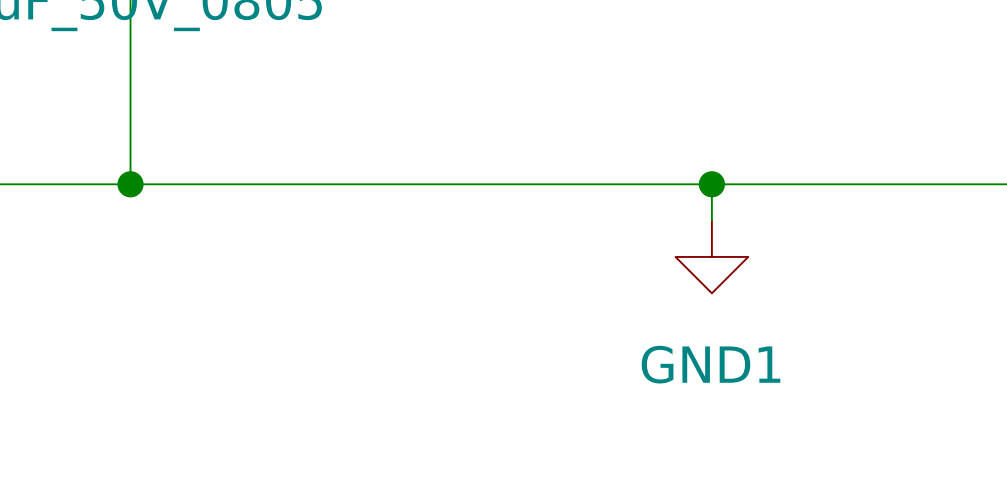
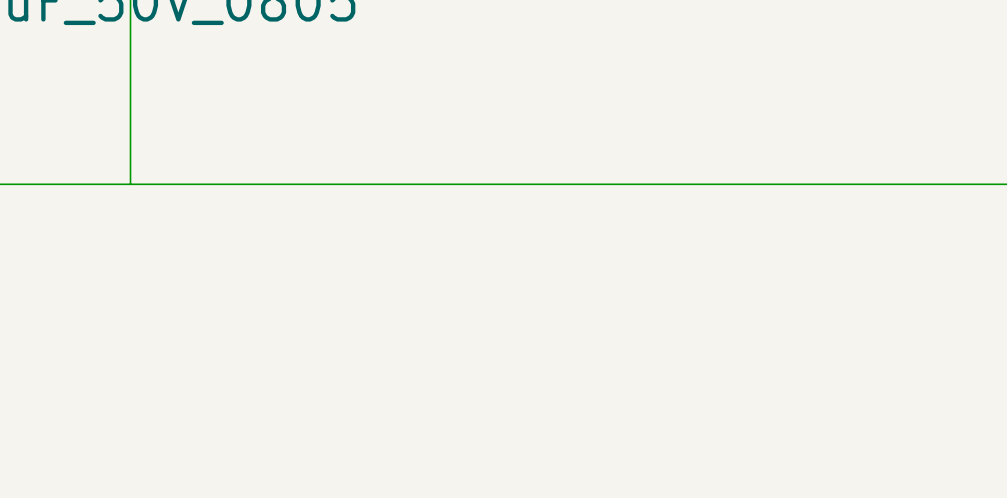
junction: (130, 184) -> none
wire: (711, 184) (711, 220) -> none
junction: (711, 184) -> none
power symbol: GND1 (711, 256) -> none

